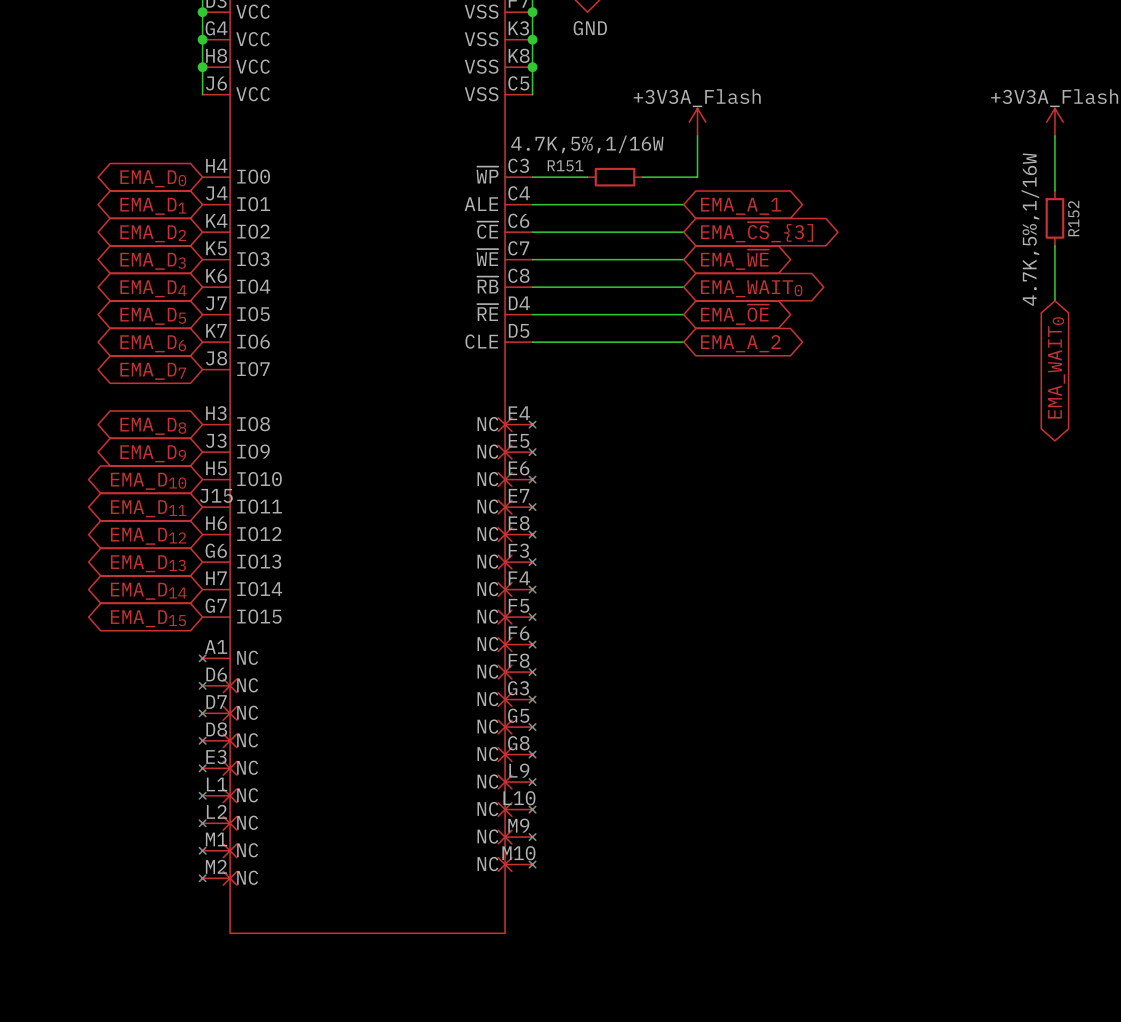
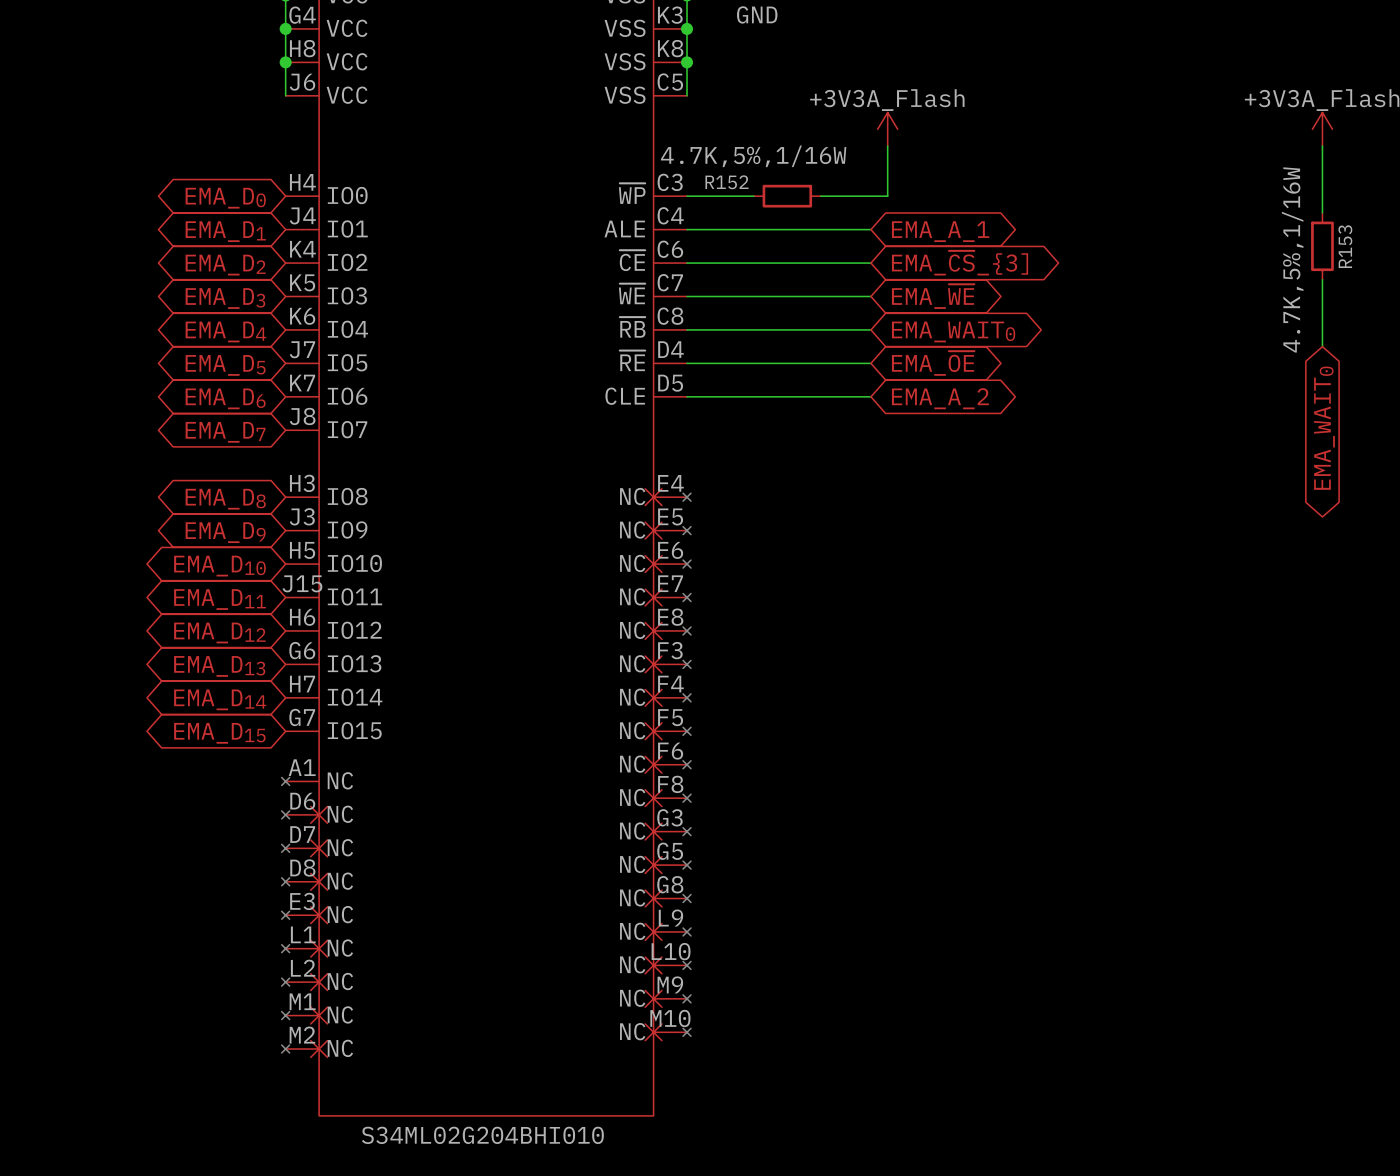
R151 name: R151 (565, 165) -> R152 (726, 182)
R152 name: R152 (1073, 218) -> R153 (1345, 246)
part value: none -> S34ML02G204BHI010 (482, 1135)

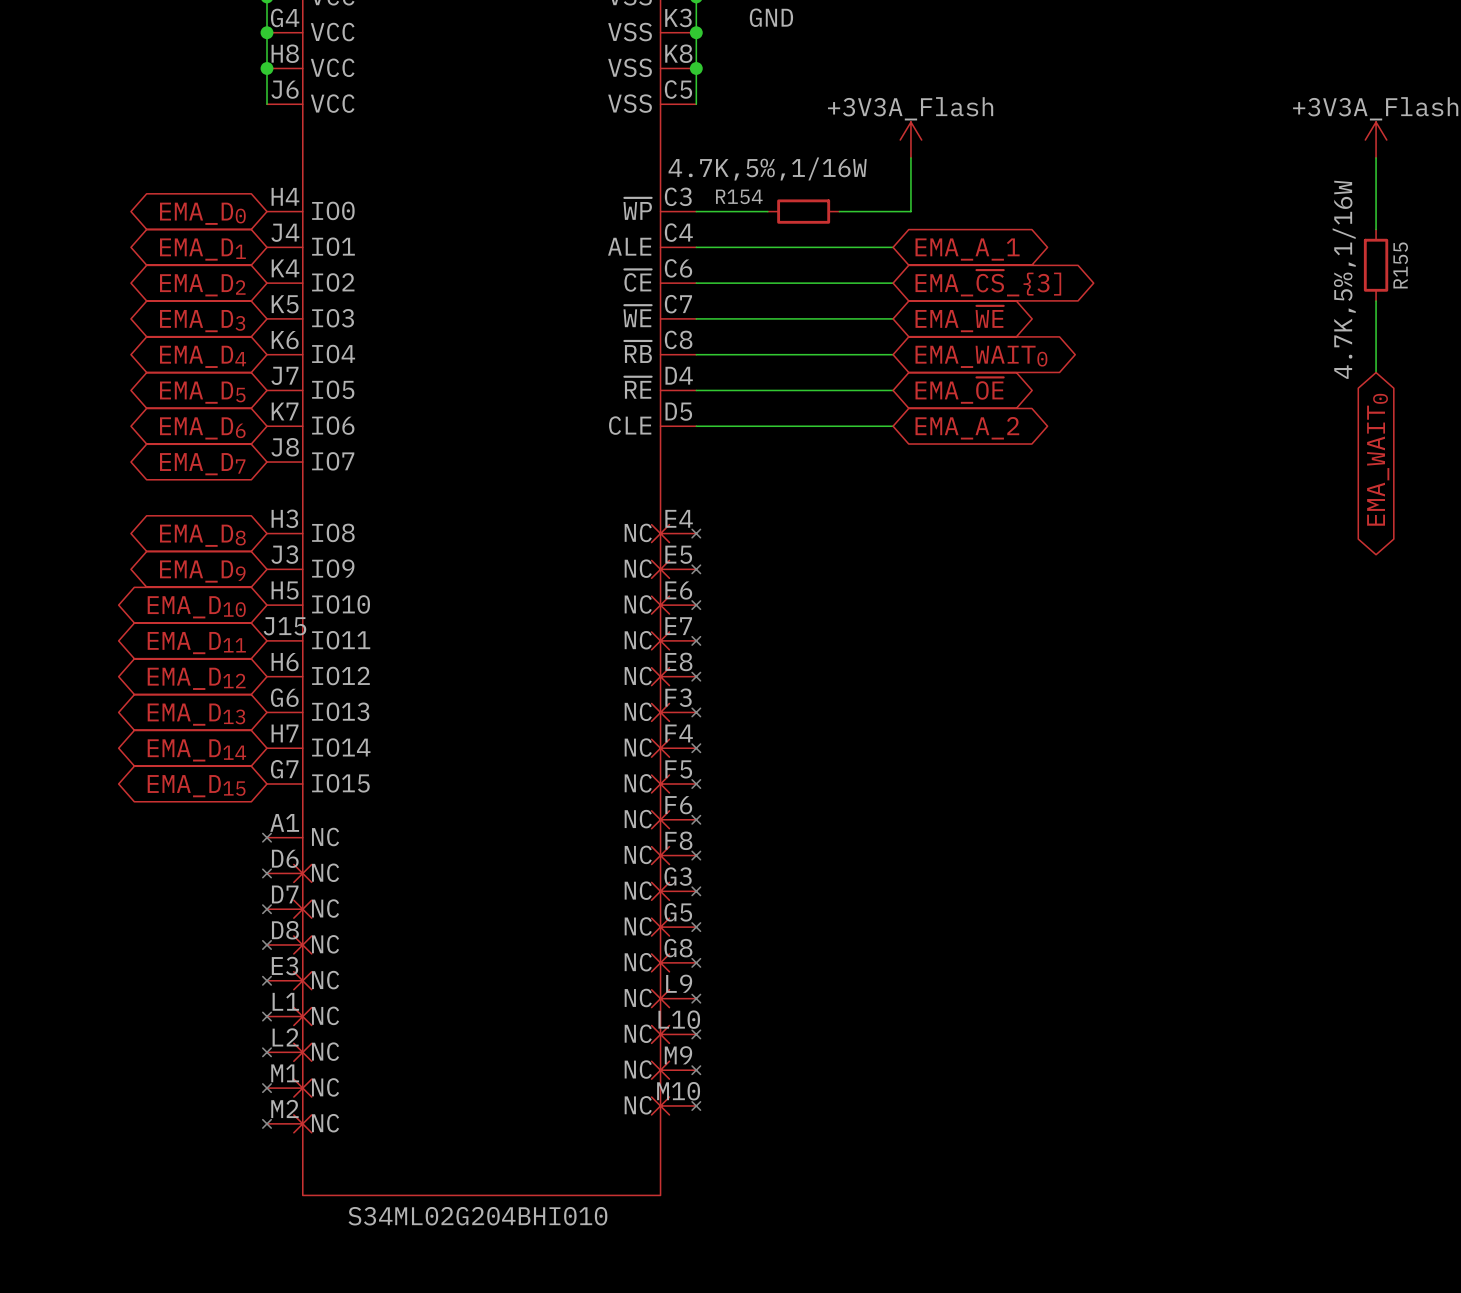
R152 name: R152 (726, 182) -> R154 (739, 196)
R153 name: R153 (1345, 246) -> R155 (1400, 265)

